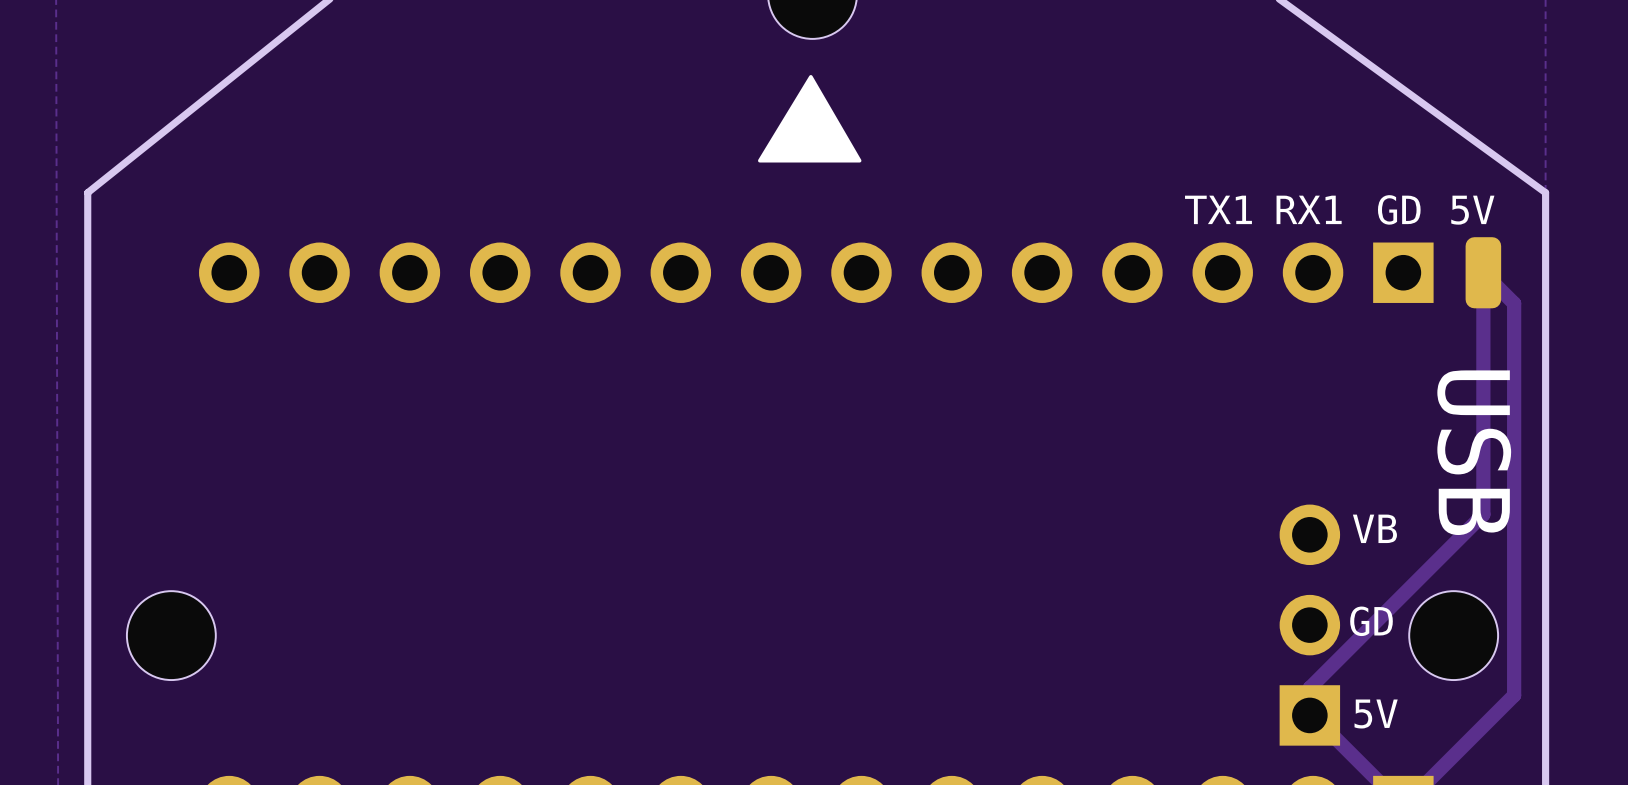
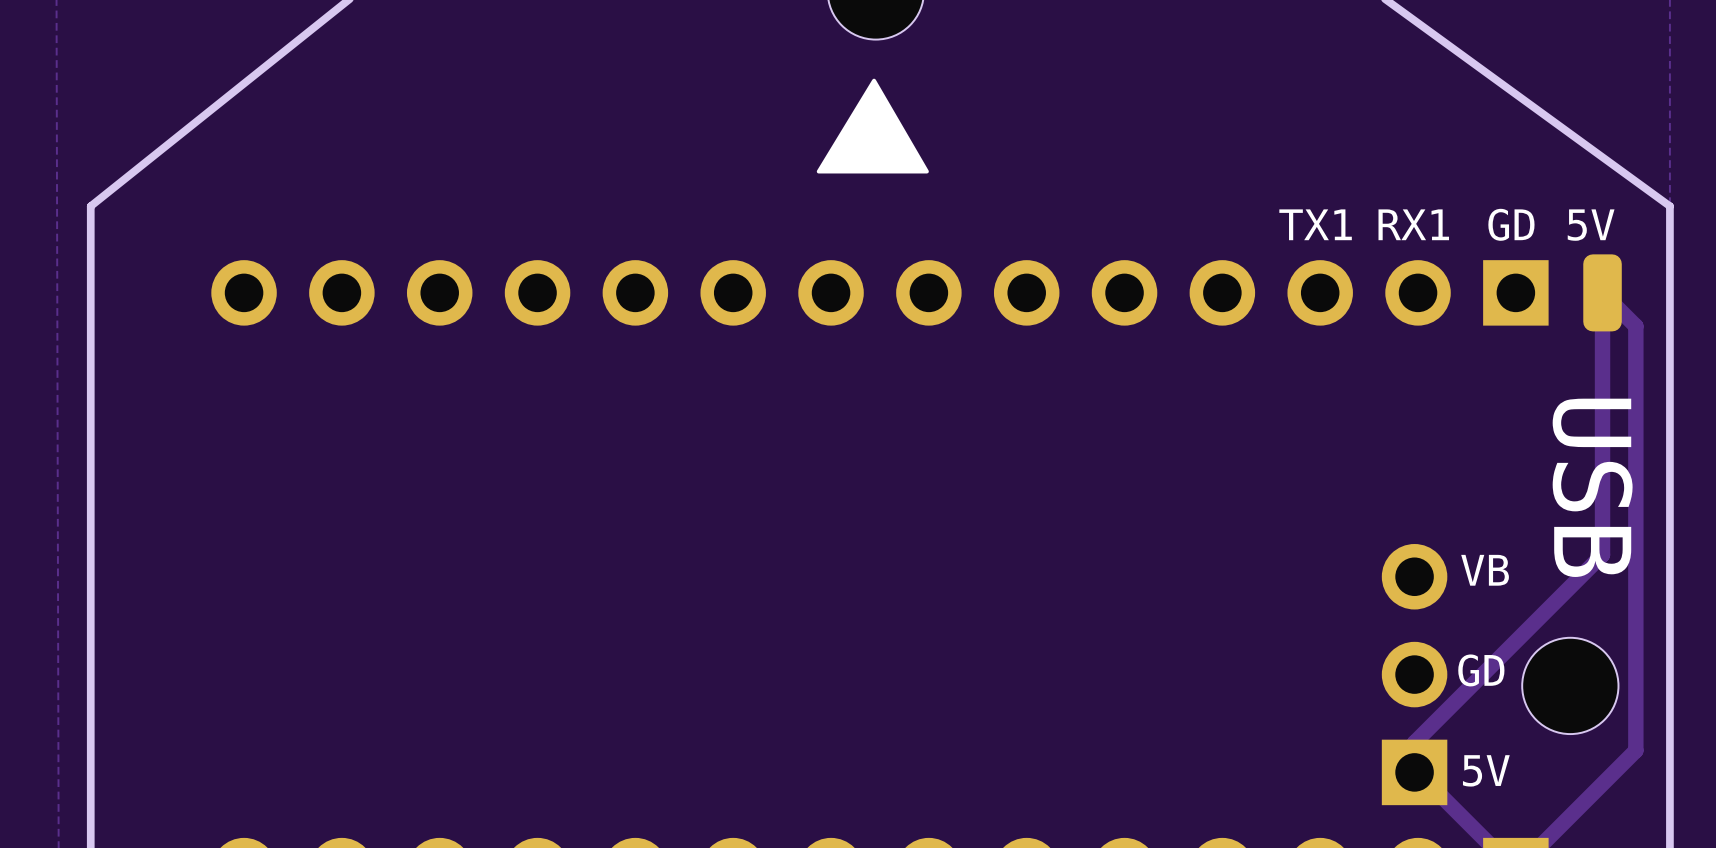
part: (171, 635) -> none

